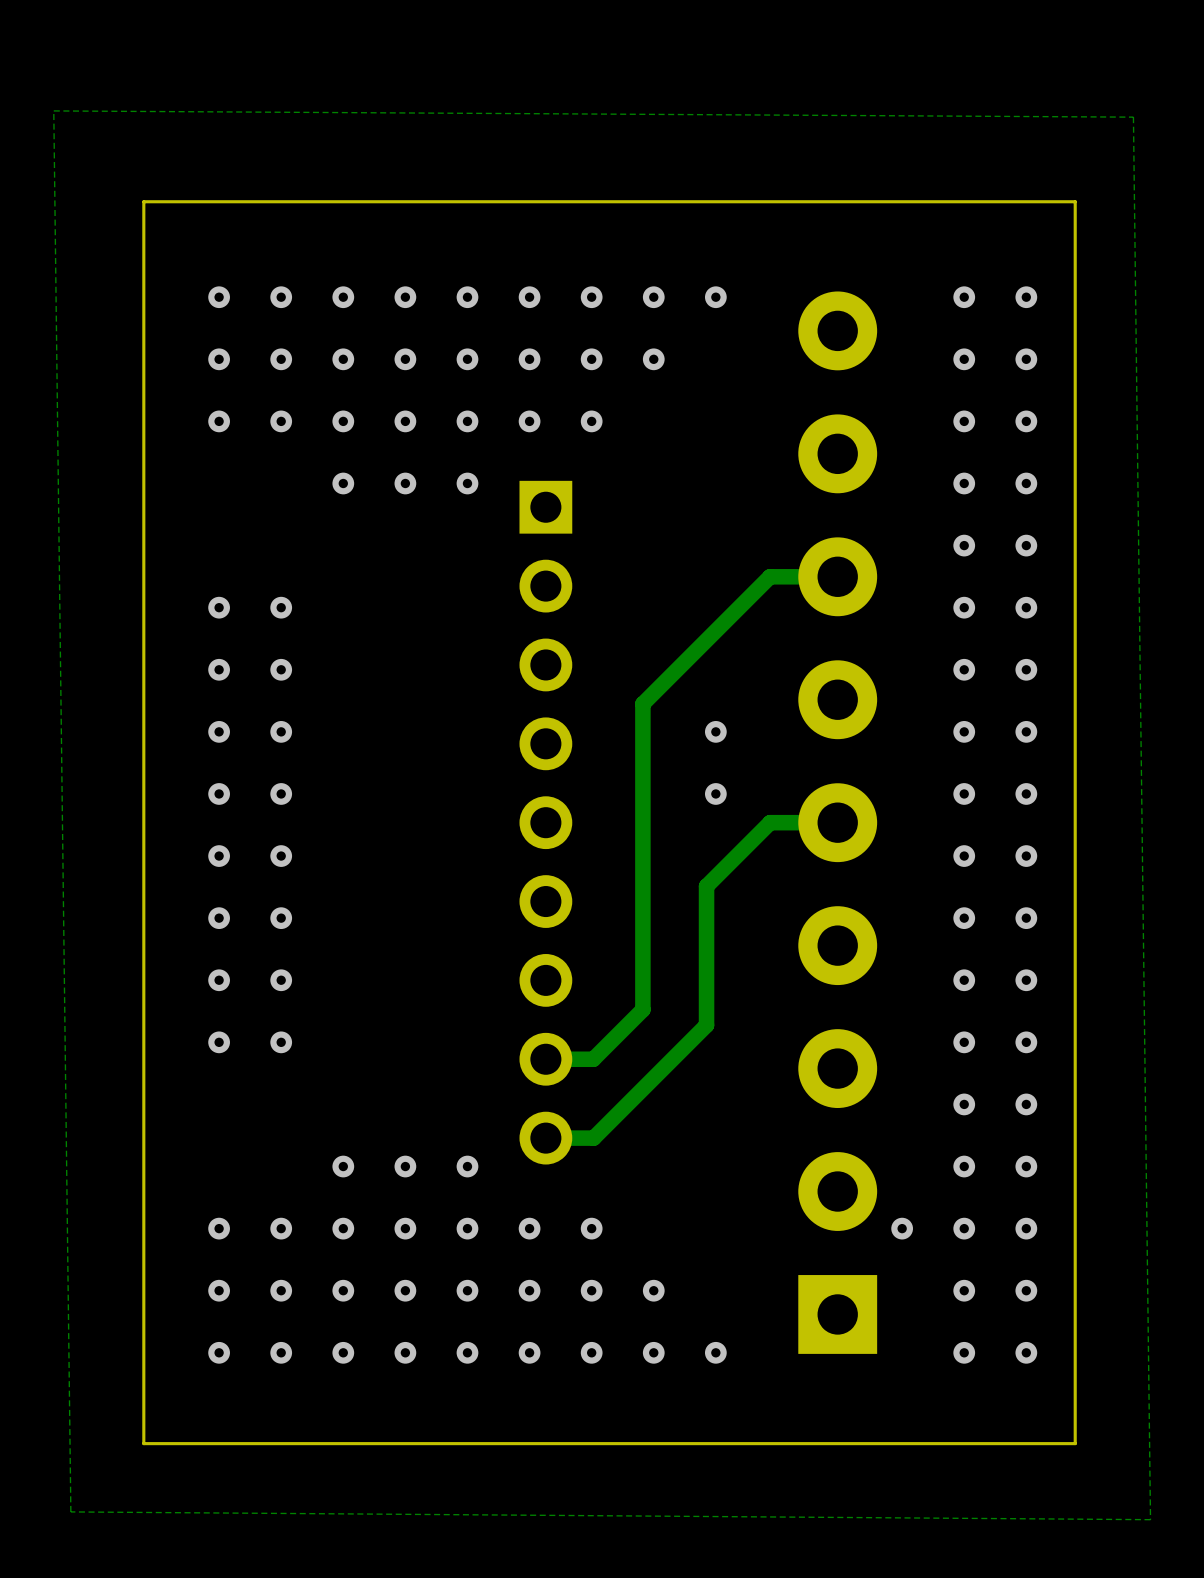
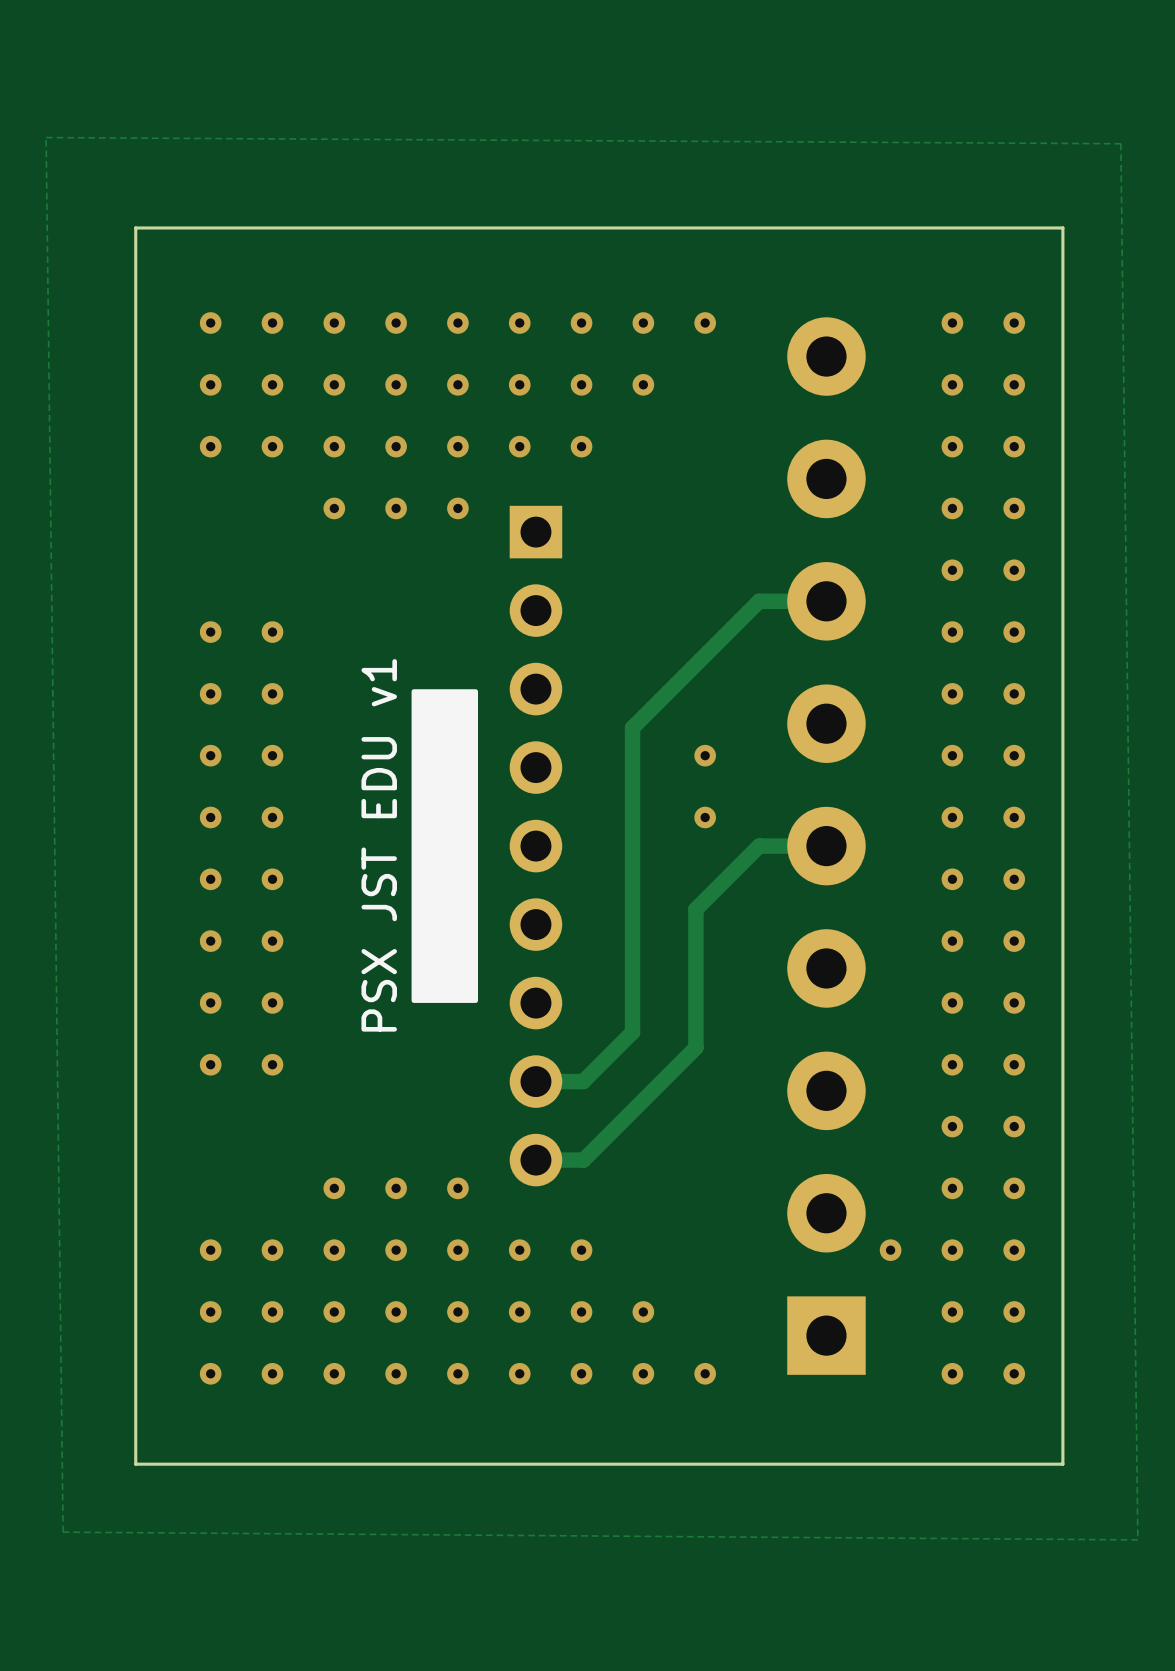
drawing: none -> [411, 689, 479, 1003]
text: none -> PSX JST EDU v1 (379, 845)

